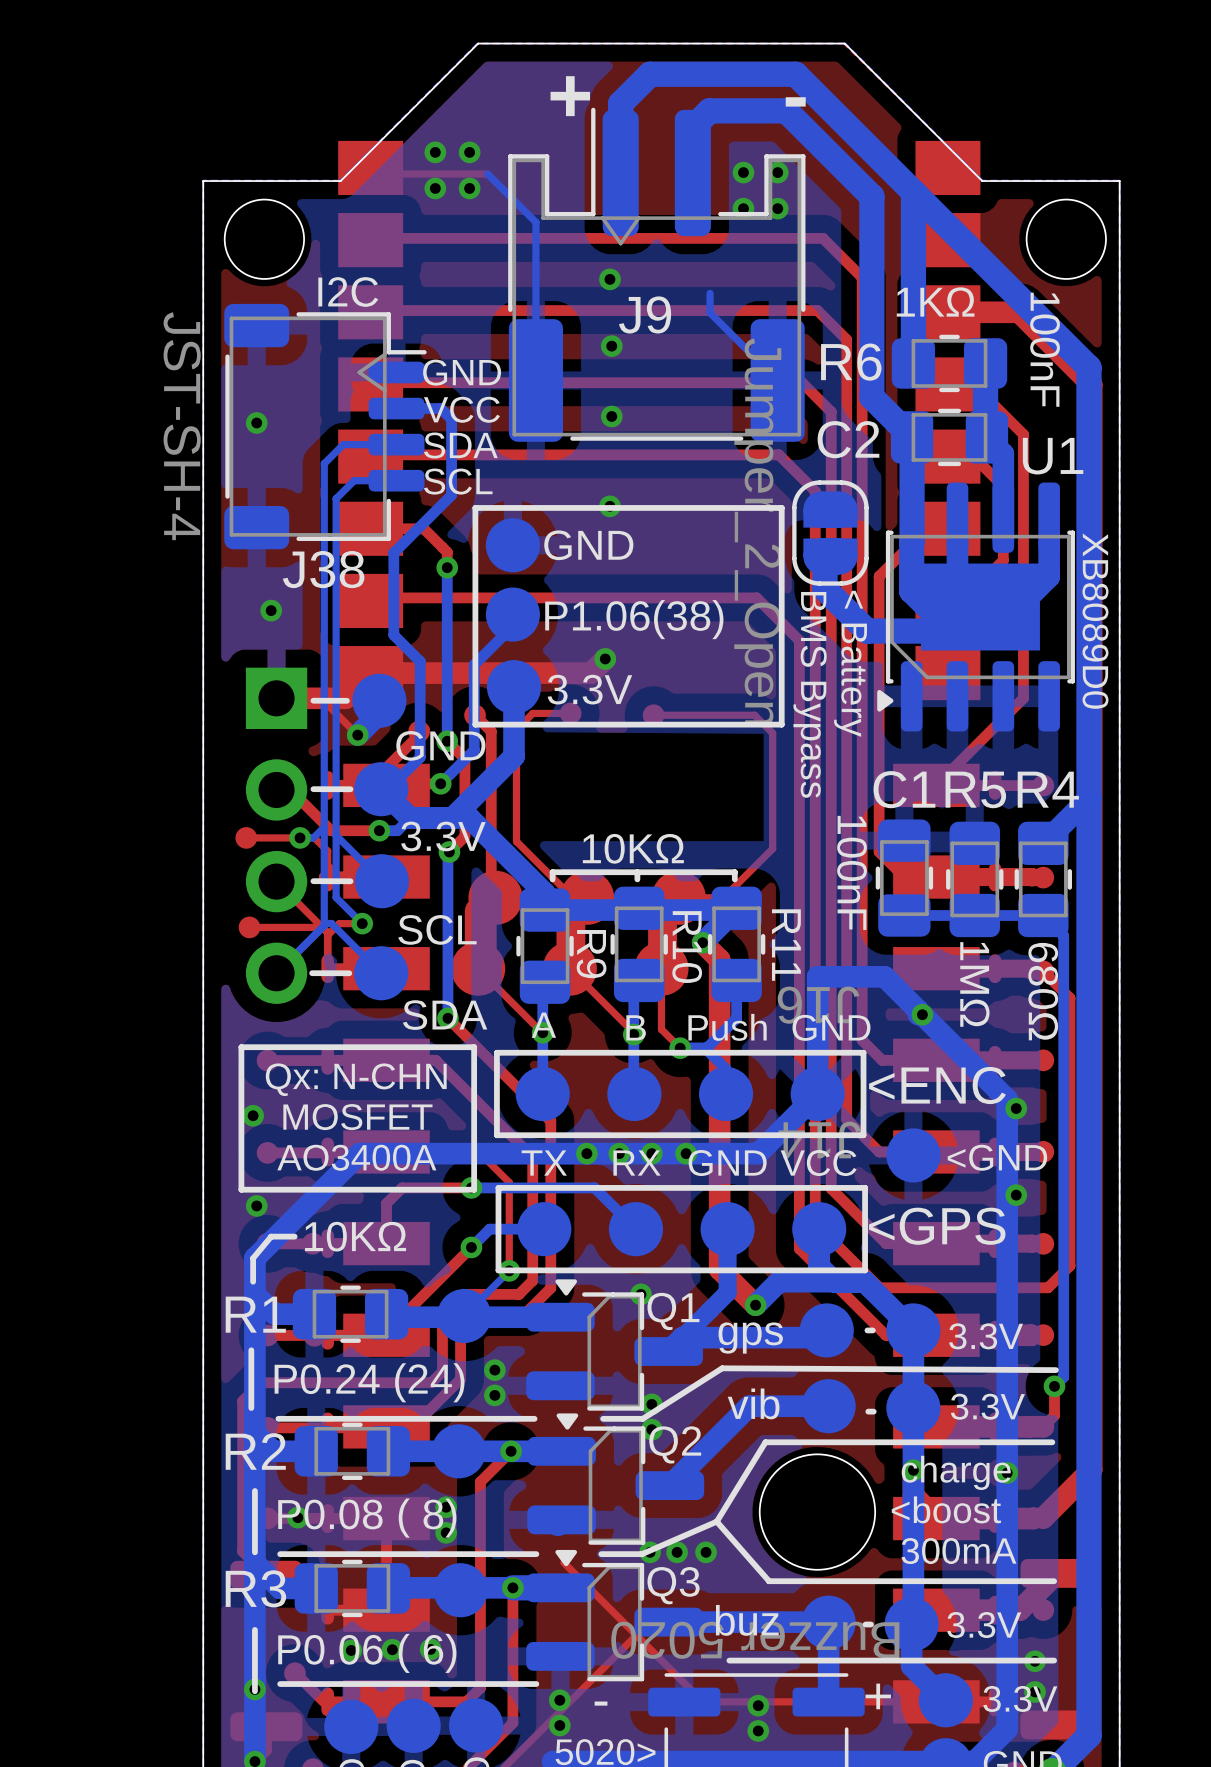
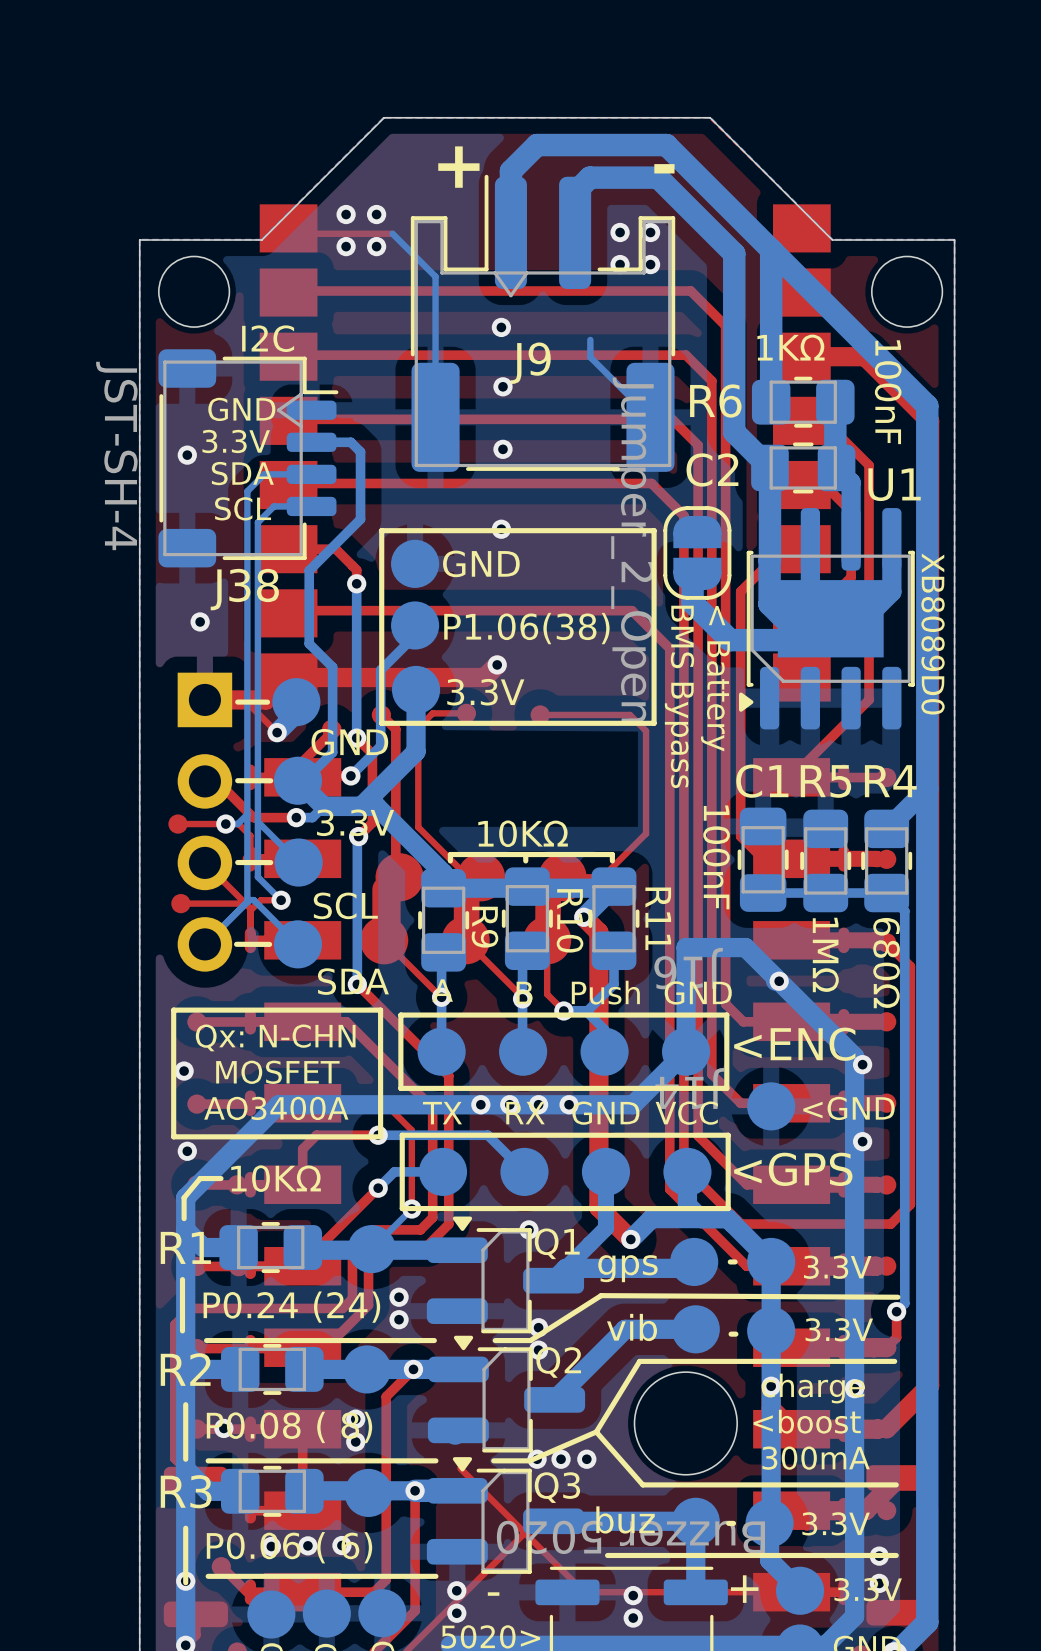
text position: GND (462, 372) -> GND (241, 409)
text: none -> 3.3V (236, 441)
text: VCC (461, 409) -> none
text position: SDA (460, 445) -> SDA (242, 473)
text position: SCL (458, 481) -> SCL (243, 508)

